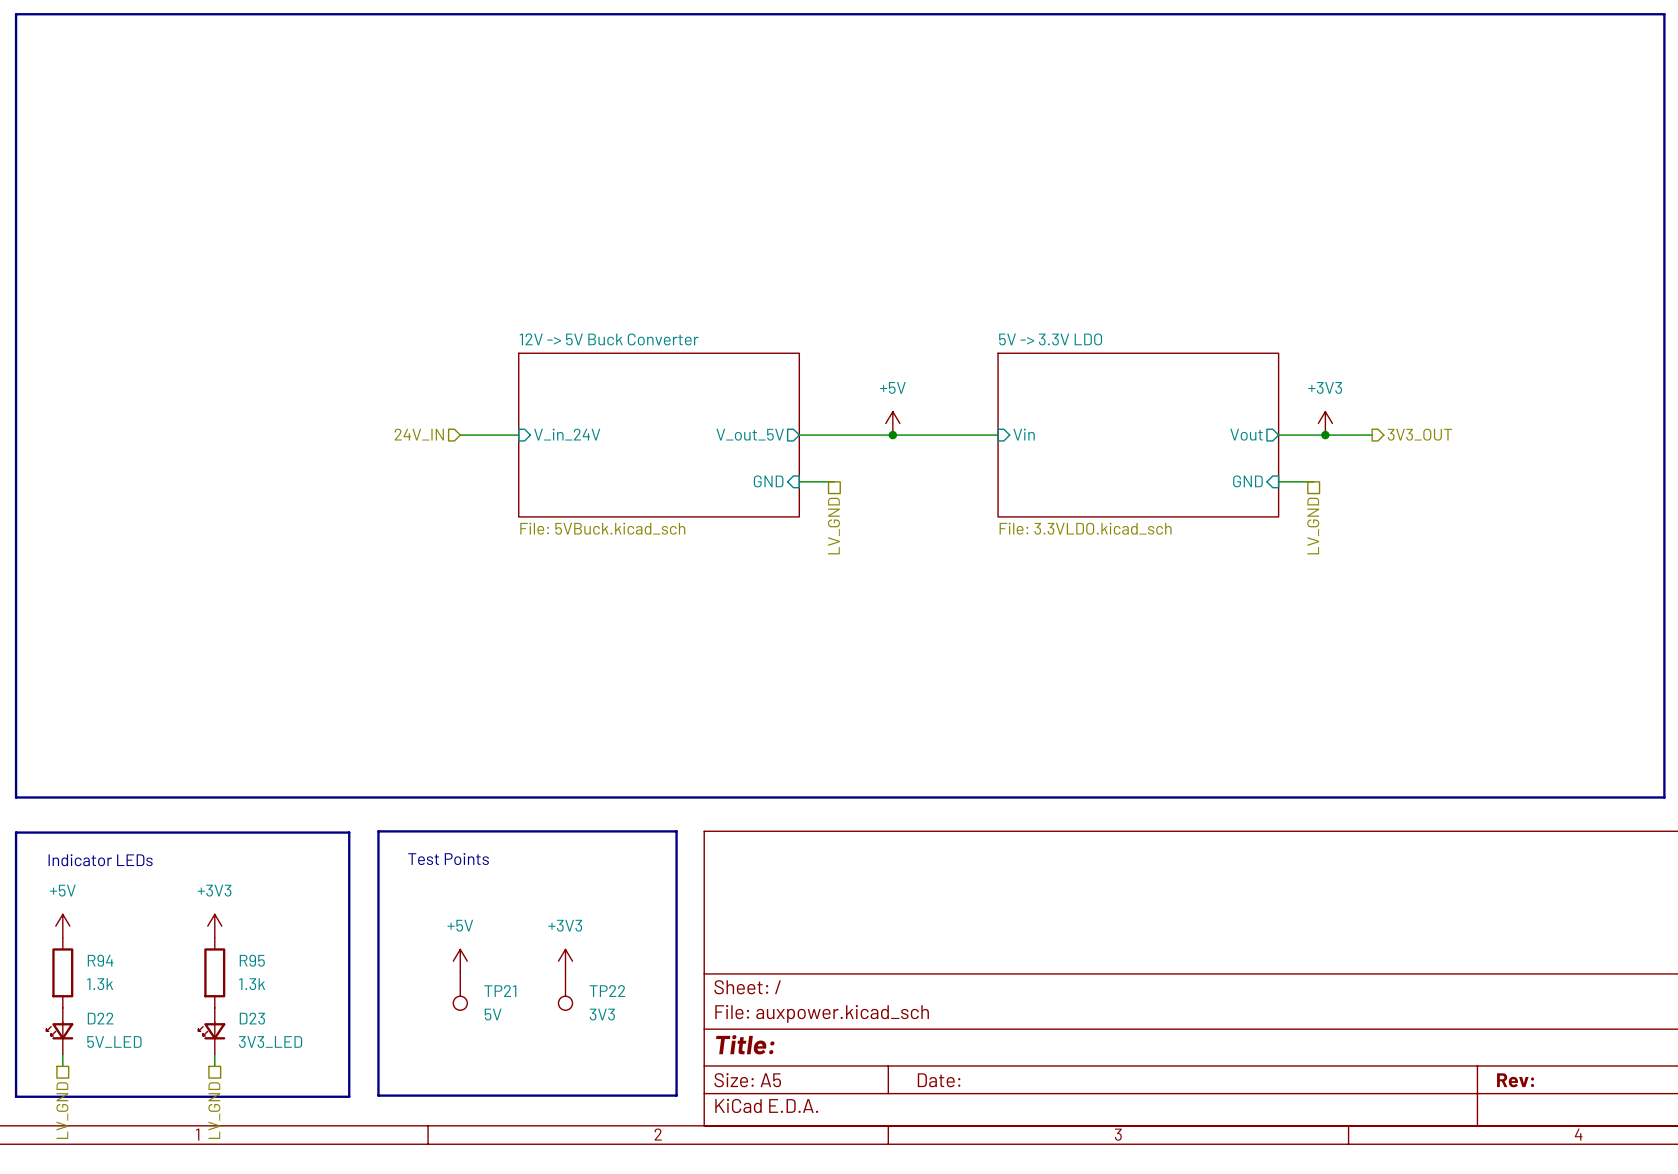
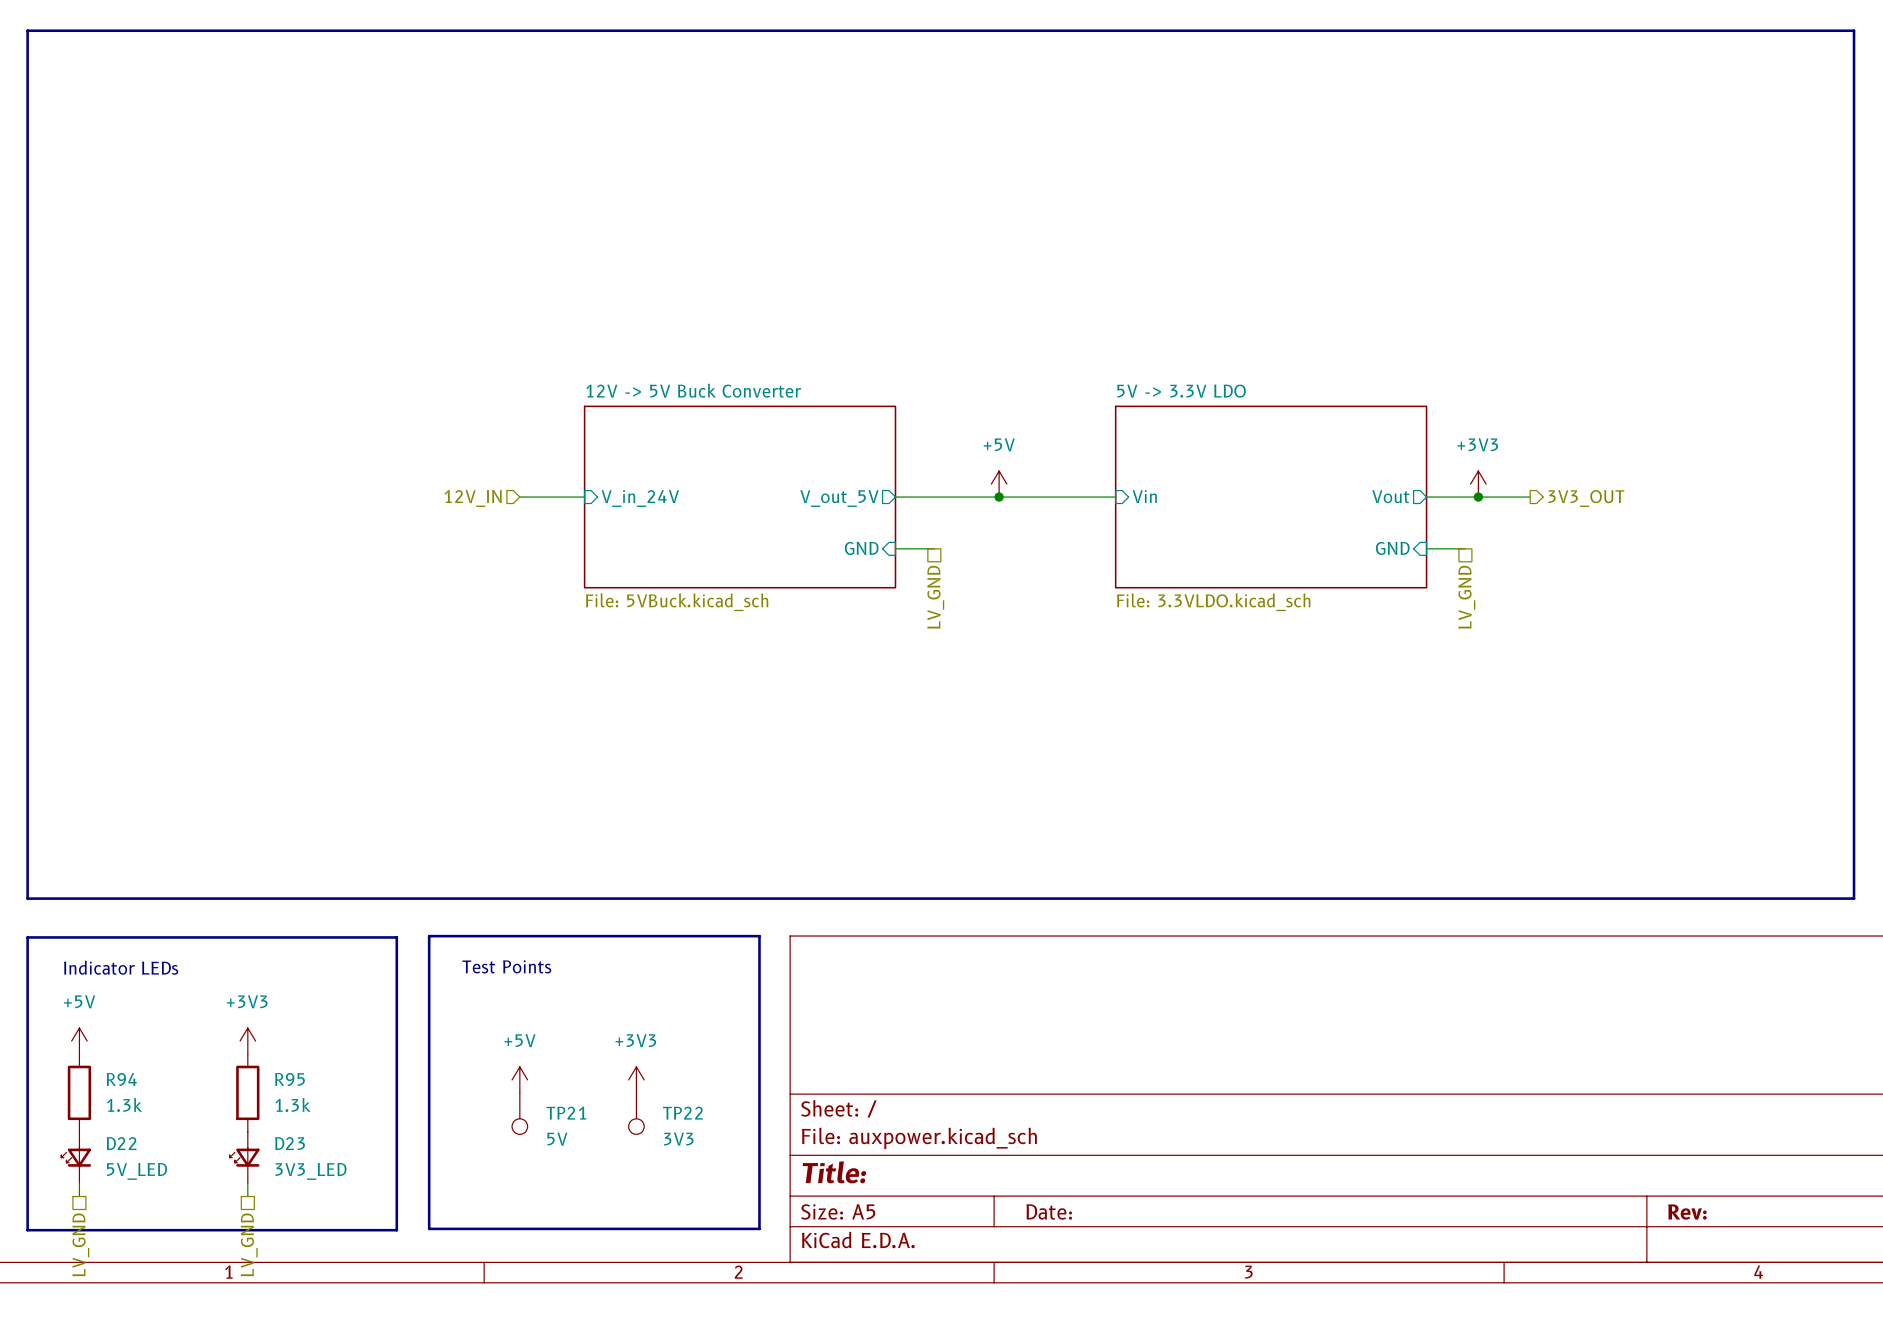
hierarchical label: 24V_IN (419, 434) -> 12V_IN (473, 498)

